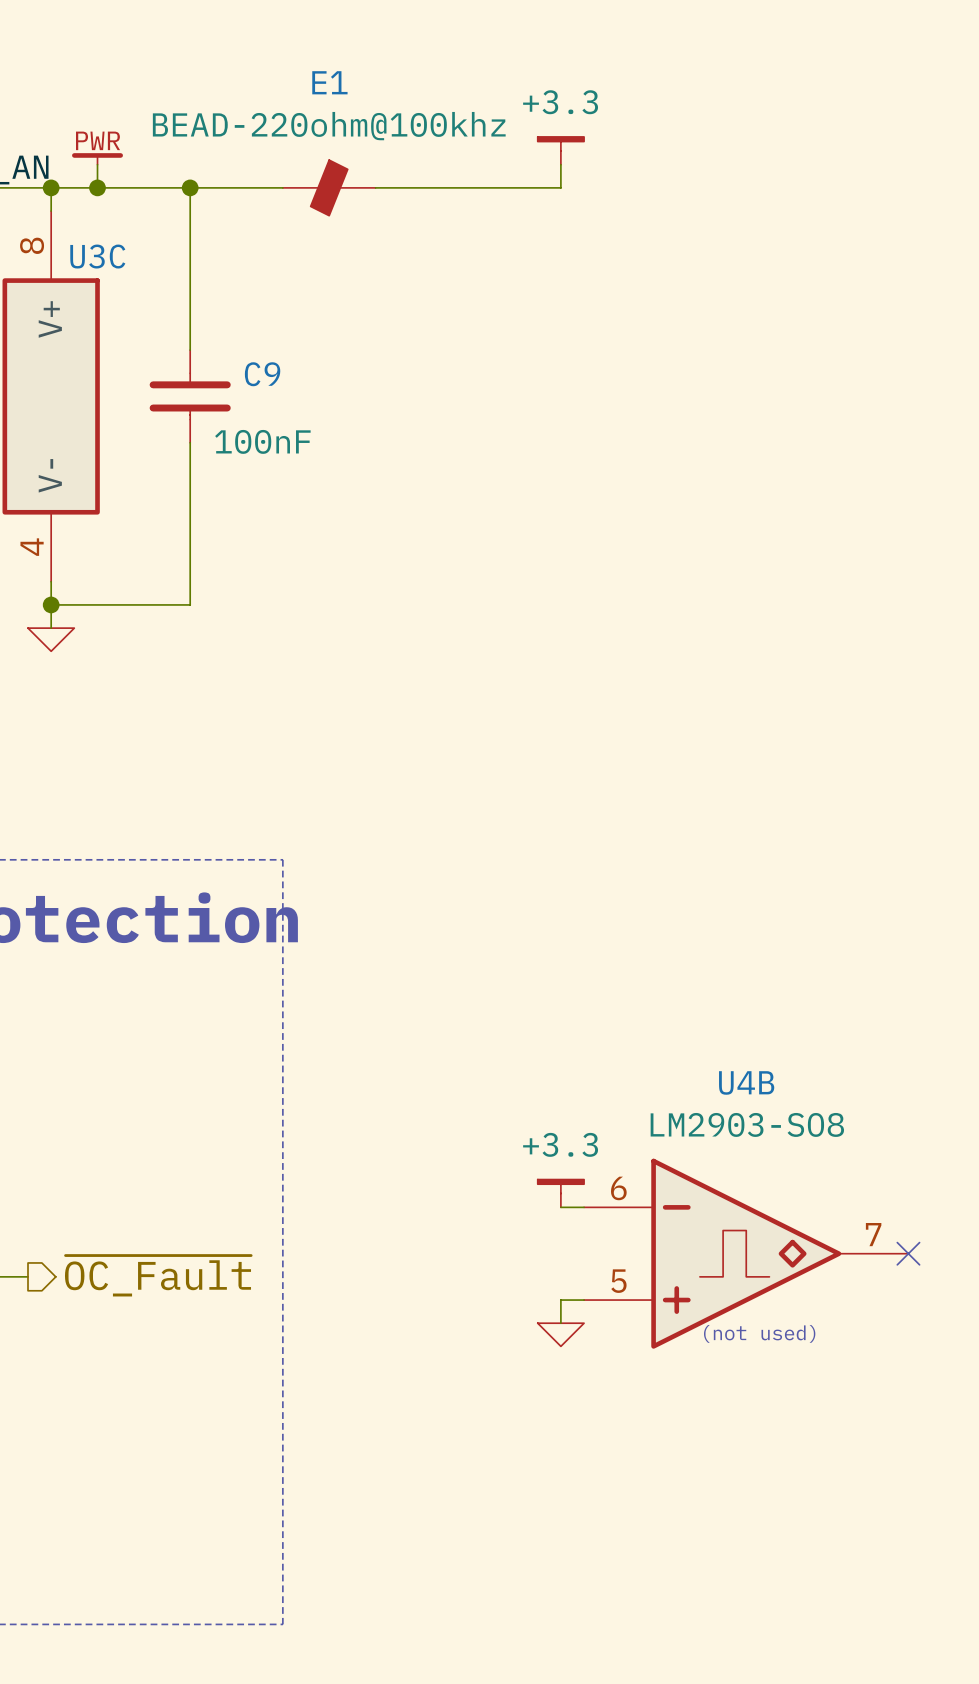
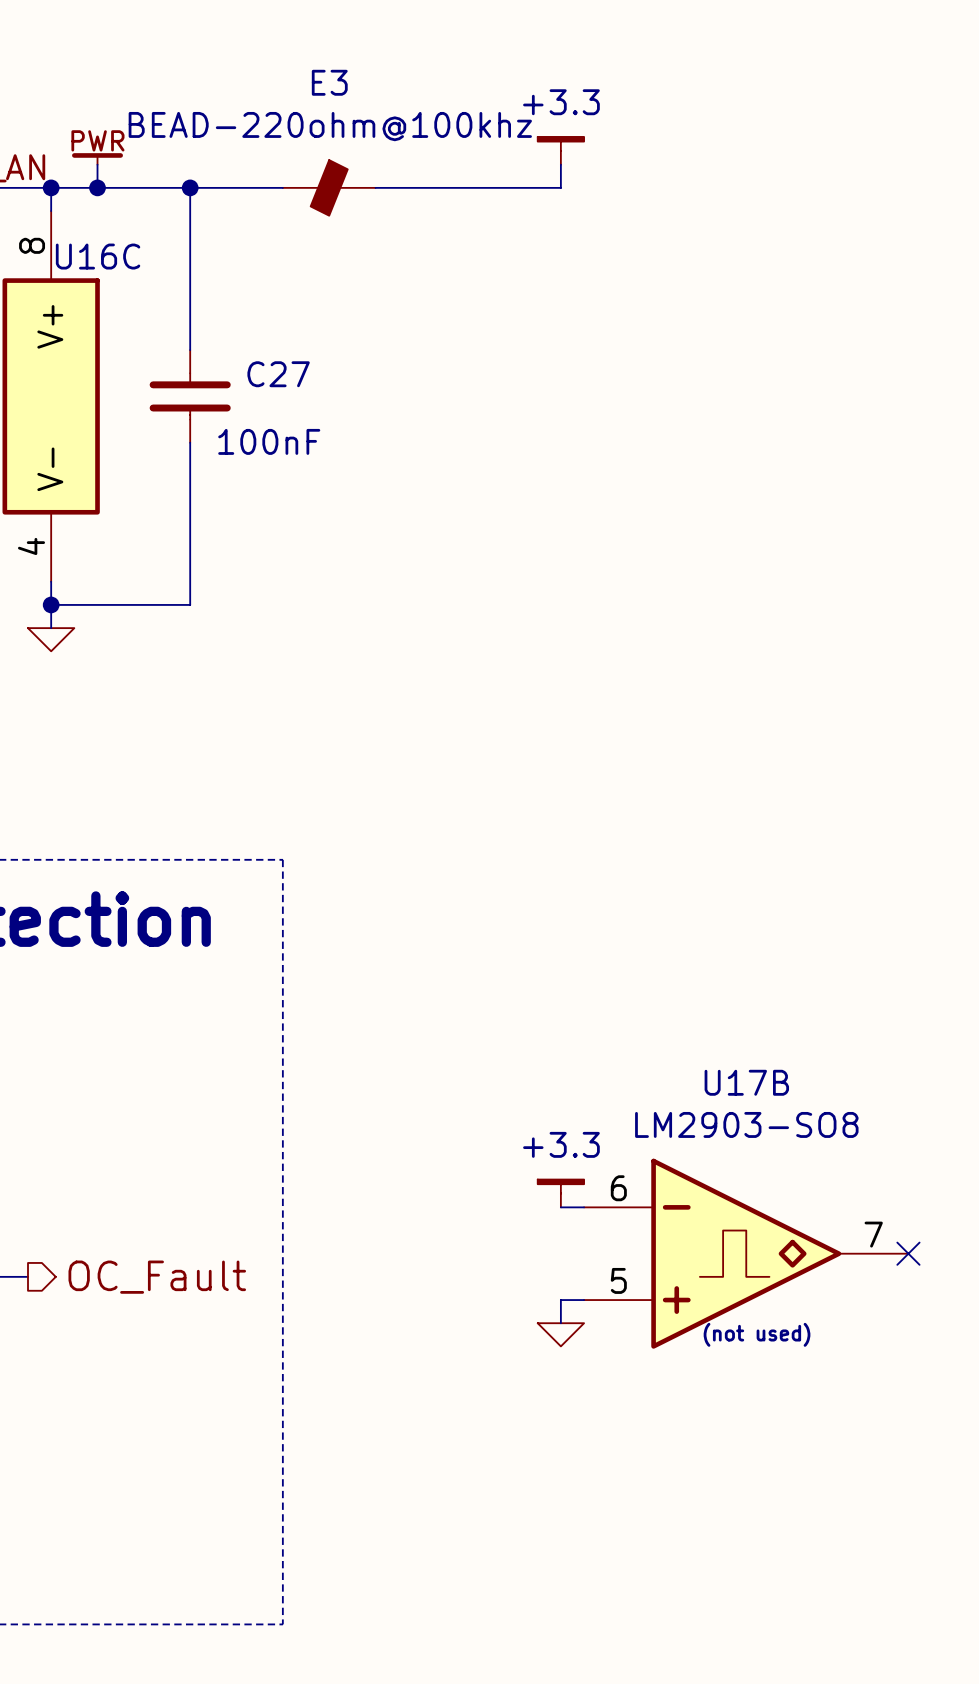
E1 name: E1 (329, 82) -> E3 (329, 82)
U3C name: U3C (97, 256) -> U16C (98, 256)
C9 name: C9 (262, 374) -> C27 (278, 374)
U4B name: U4B (746, 1082) -> U17B (746, 1082)
hierarchical label: ~{OC_Fault} (158, 1276) -> OC_Fault (157, 1277)

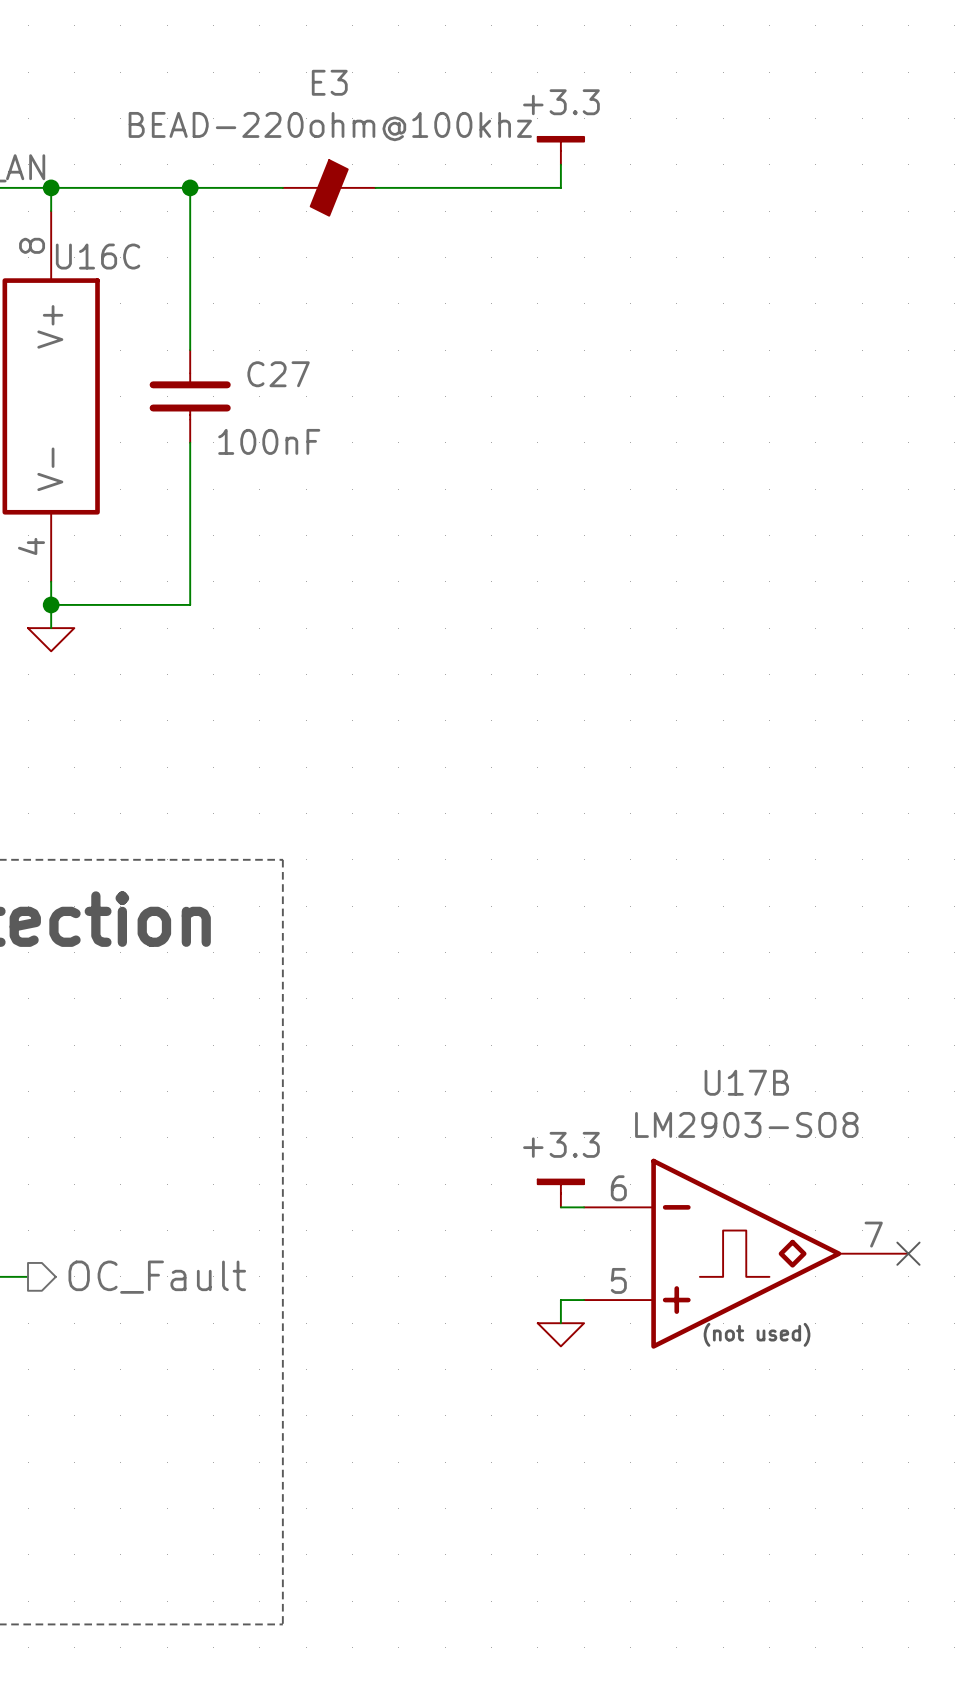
power symbol: (97, 158) -> none
wire: (97, 164) (97, 187) -> none
junction: (97, 187) -> none

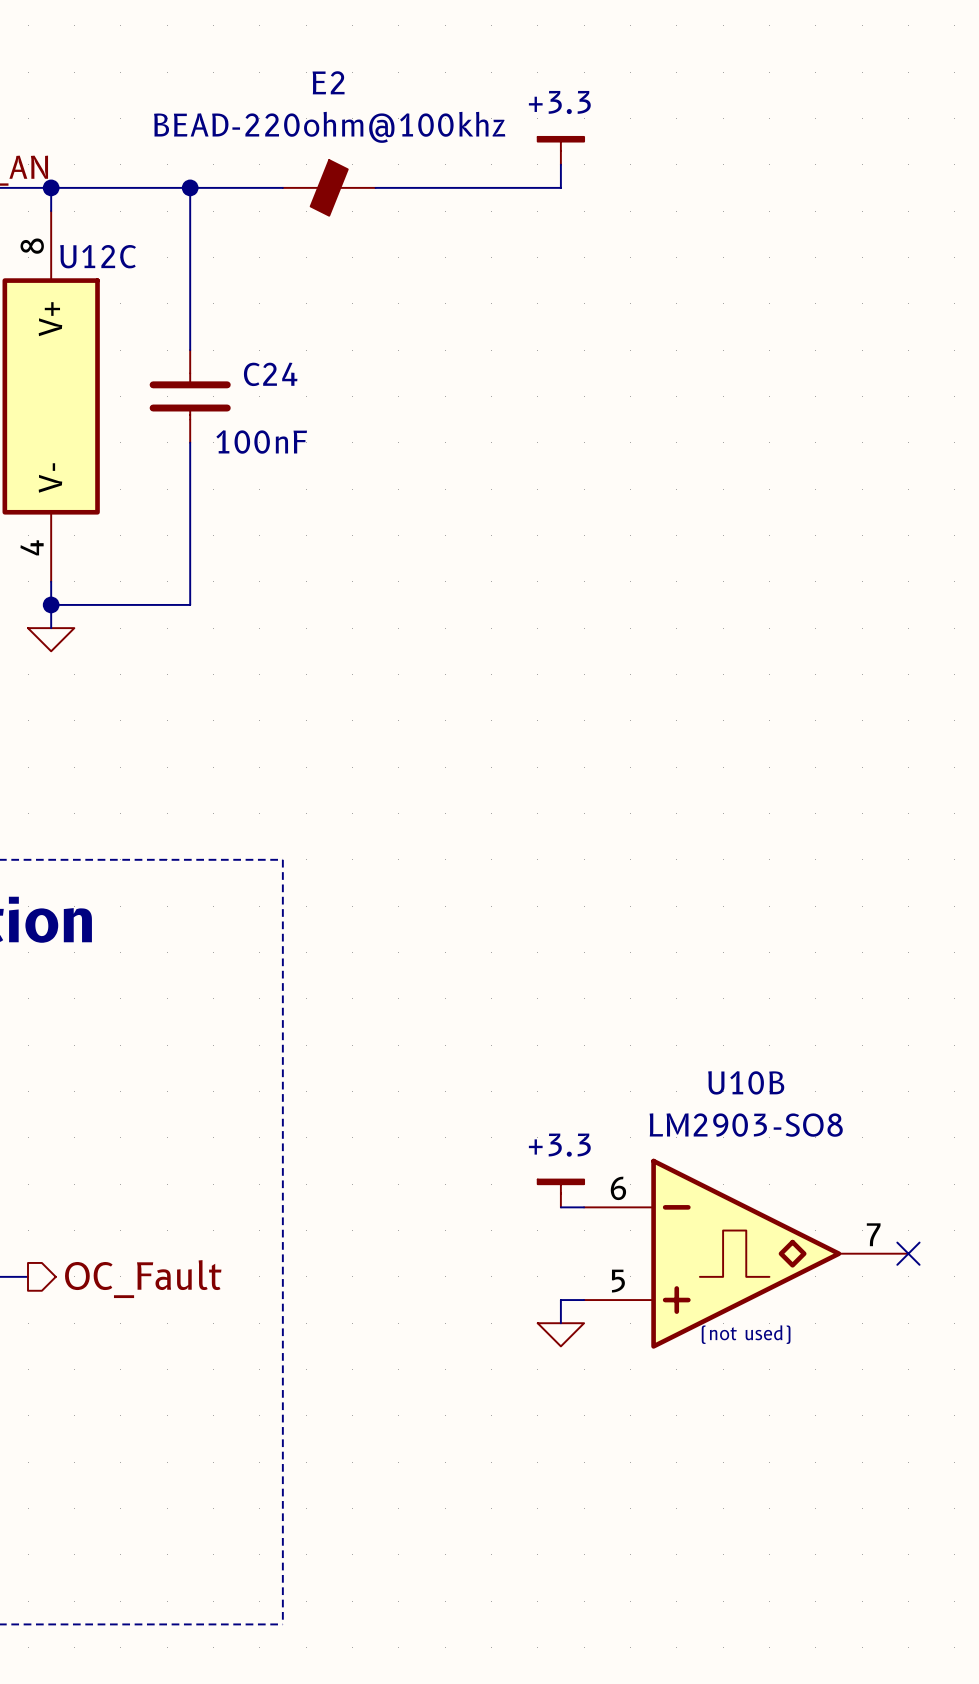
E3 name: E3 (329, 82) -> E2 (328, 82)
U16C name: U16C (98, 256) -> U12C (98, 256)
C27 name: C27 (278, 374) -> C24 (270, 374)
U17B name: U17B (746, 1082) -> U10B (746, 1082)

